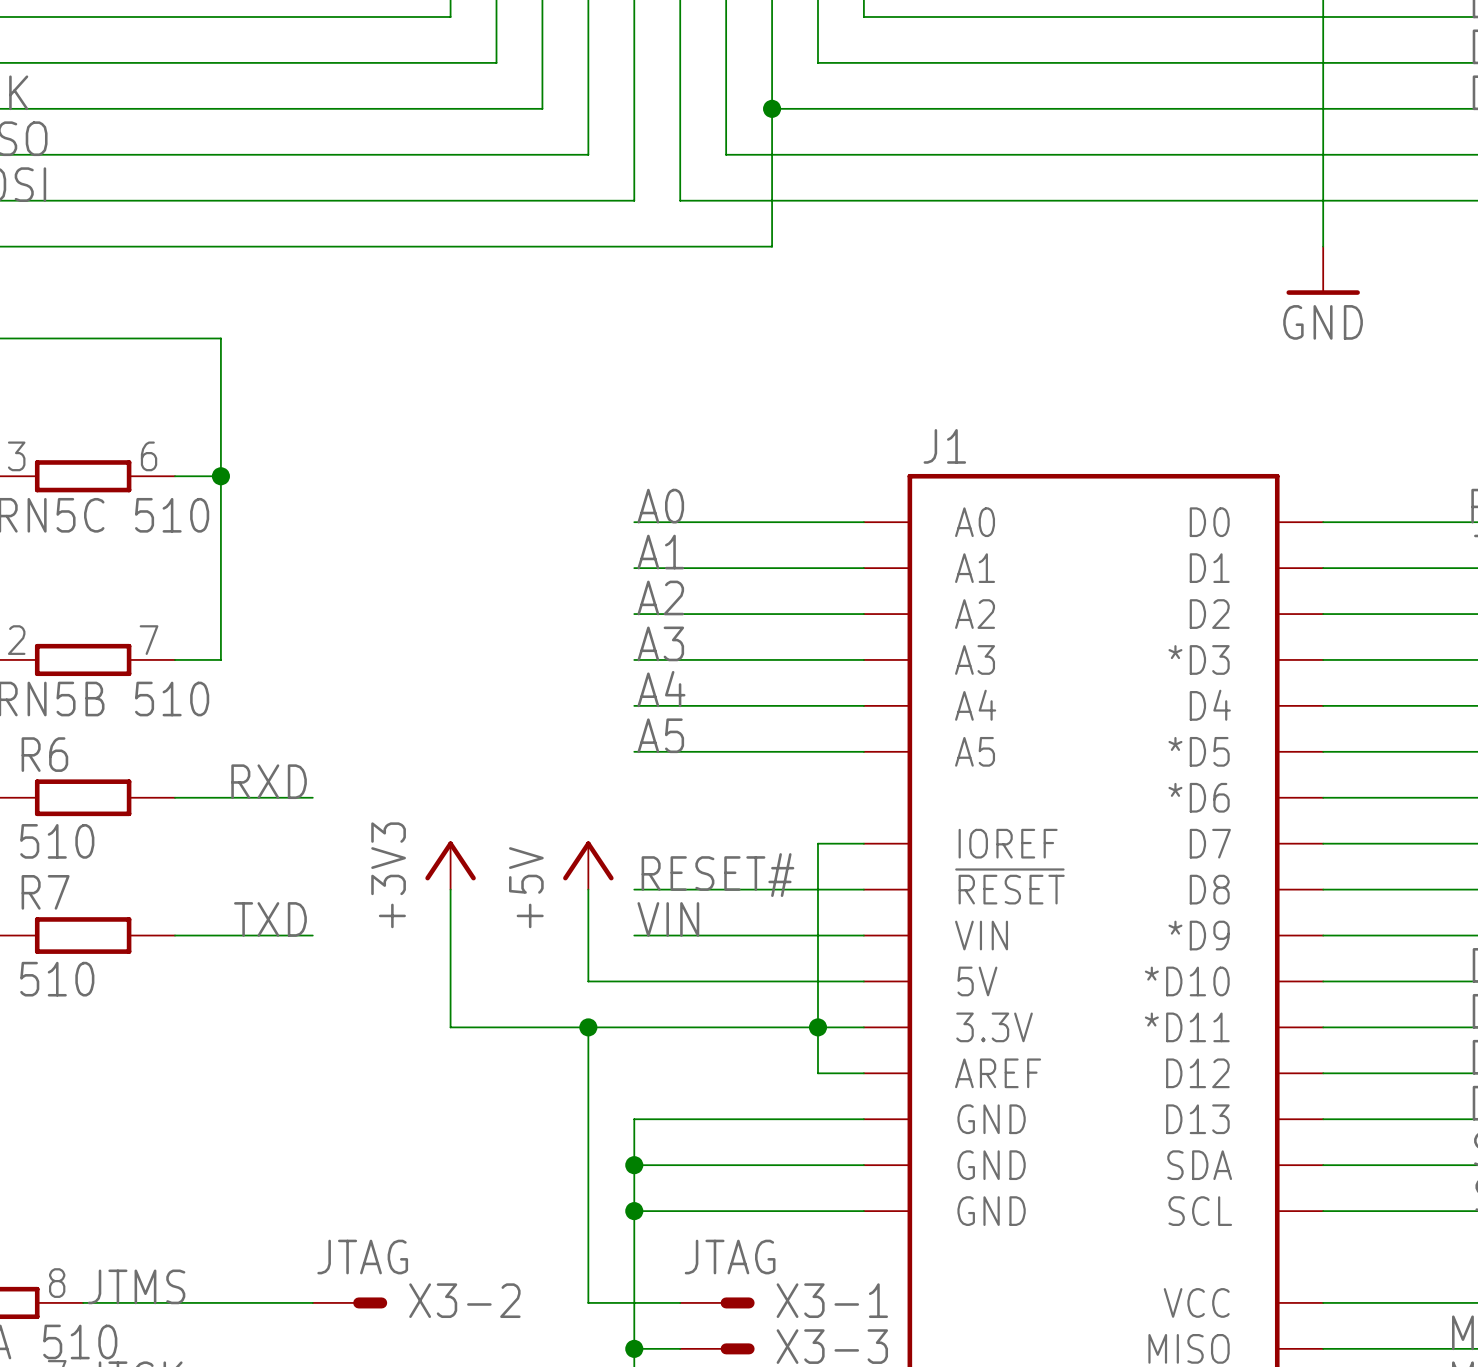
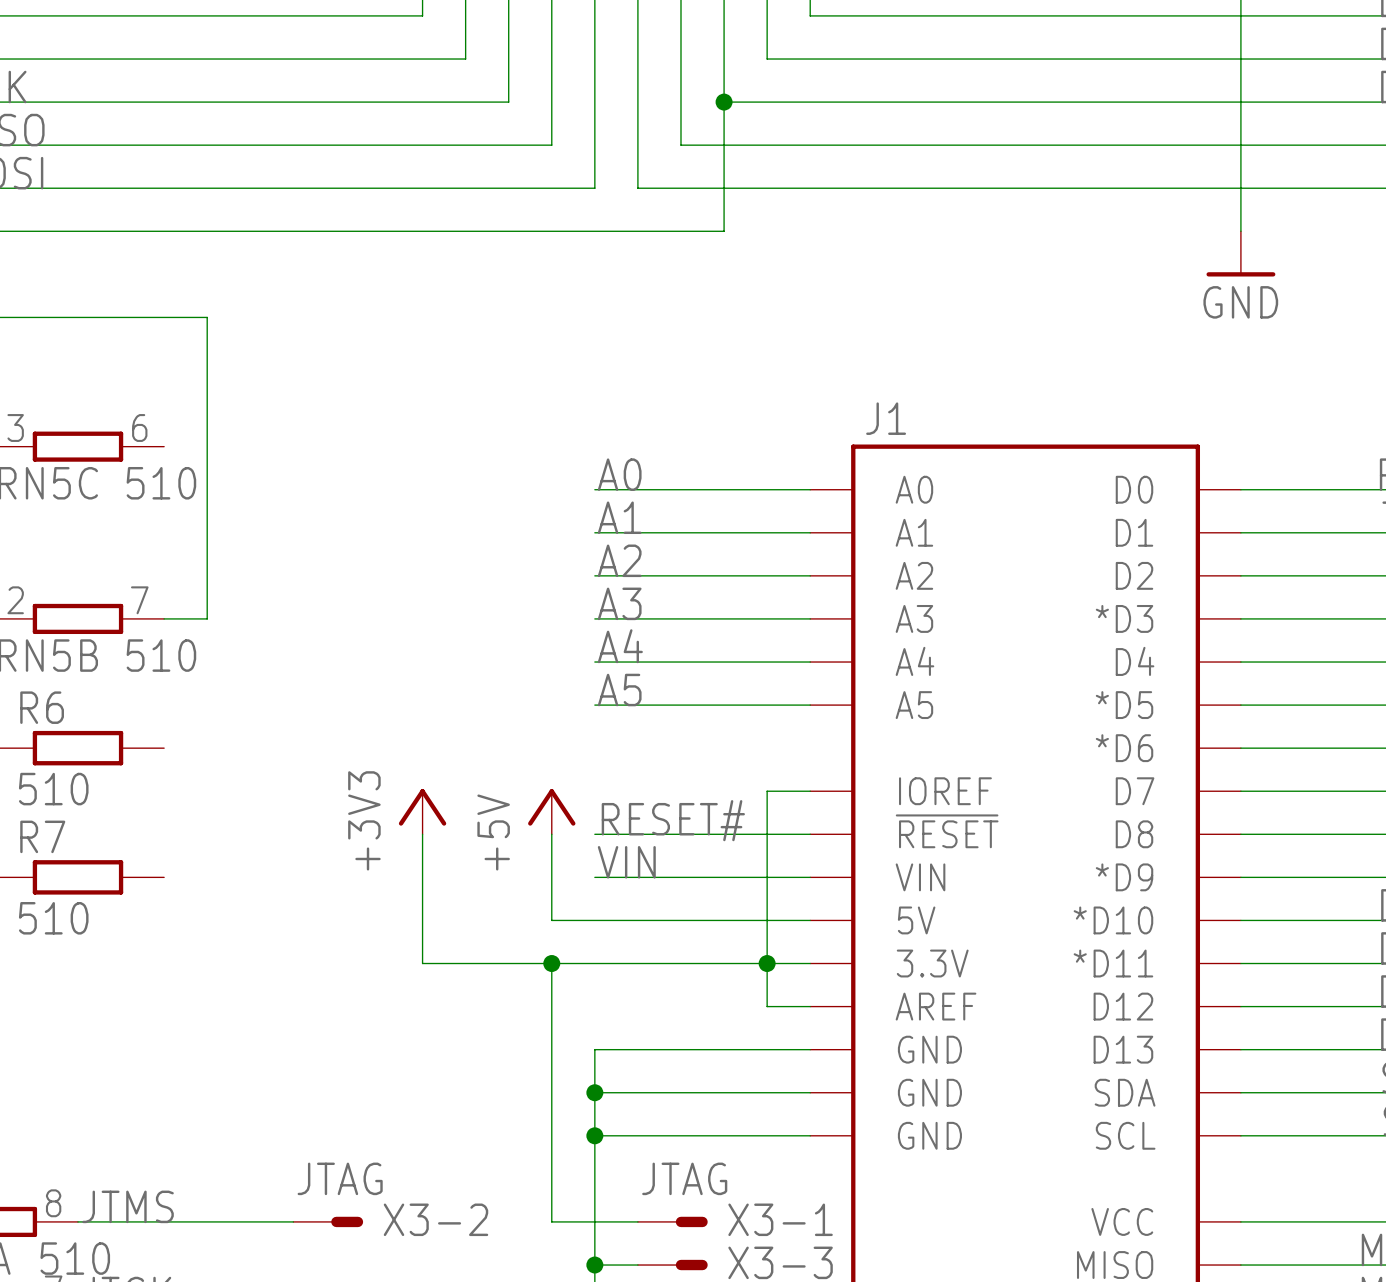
wire: (175, 476) (220, 476) -> none
junction: (220, 476) -> none
label: RXD (269, 781) -> none
wire: (175, 797) (312, 797) -> none
label: TXD (270, 919) -> none
wire: (175, 935) (312, 935) -> none

